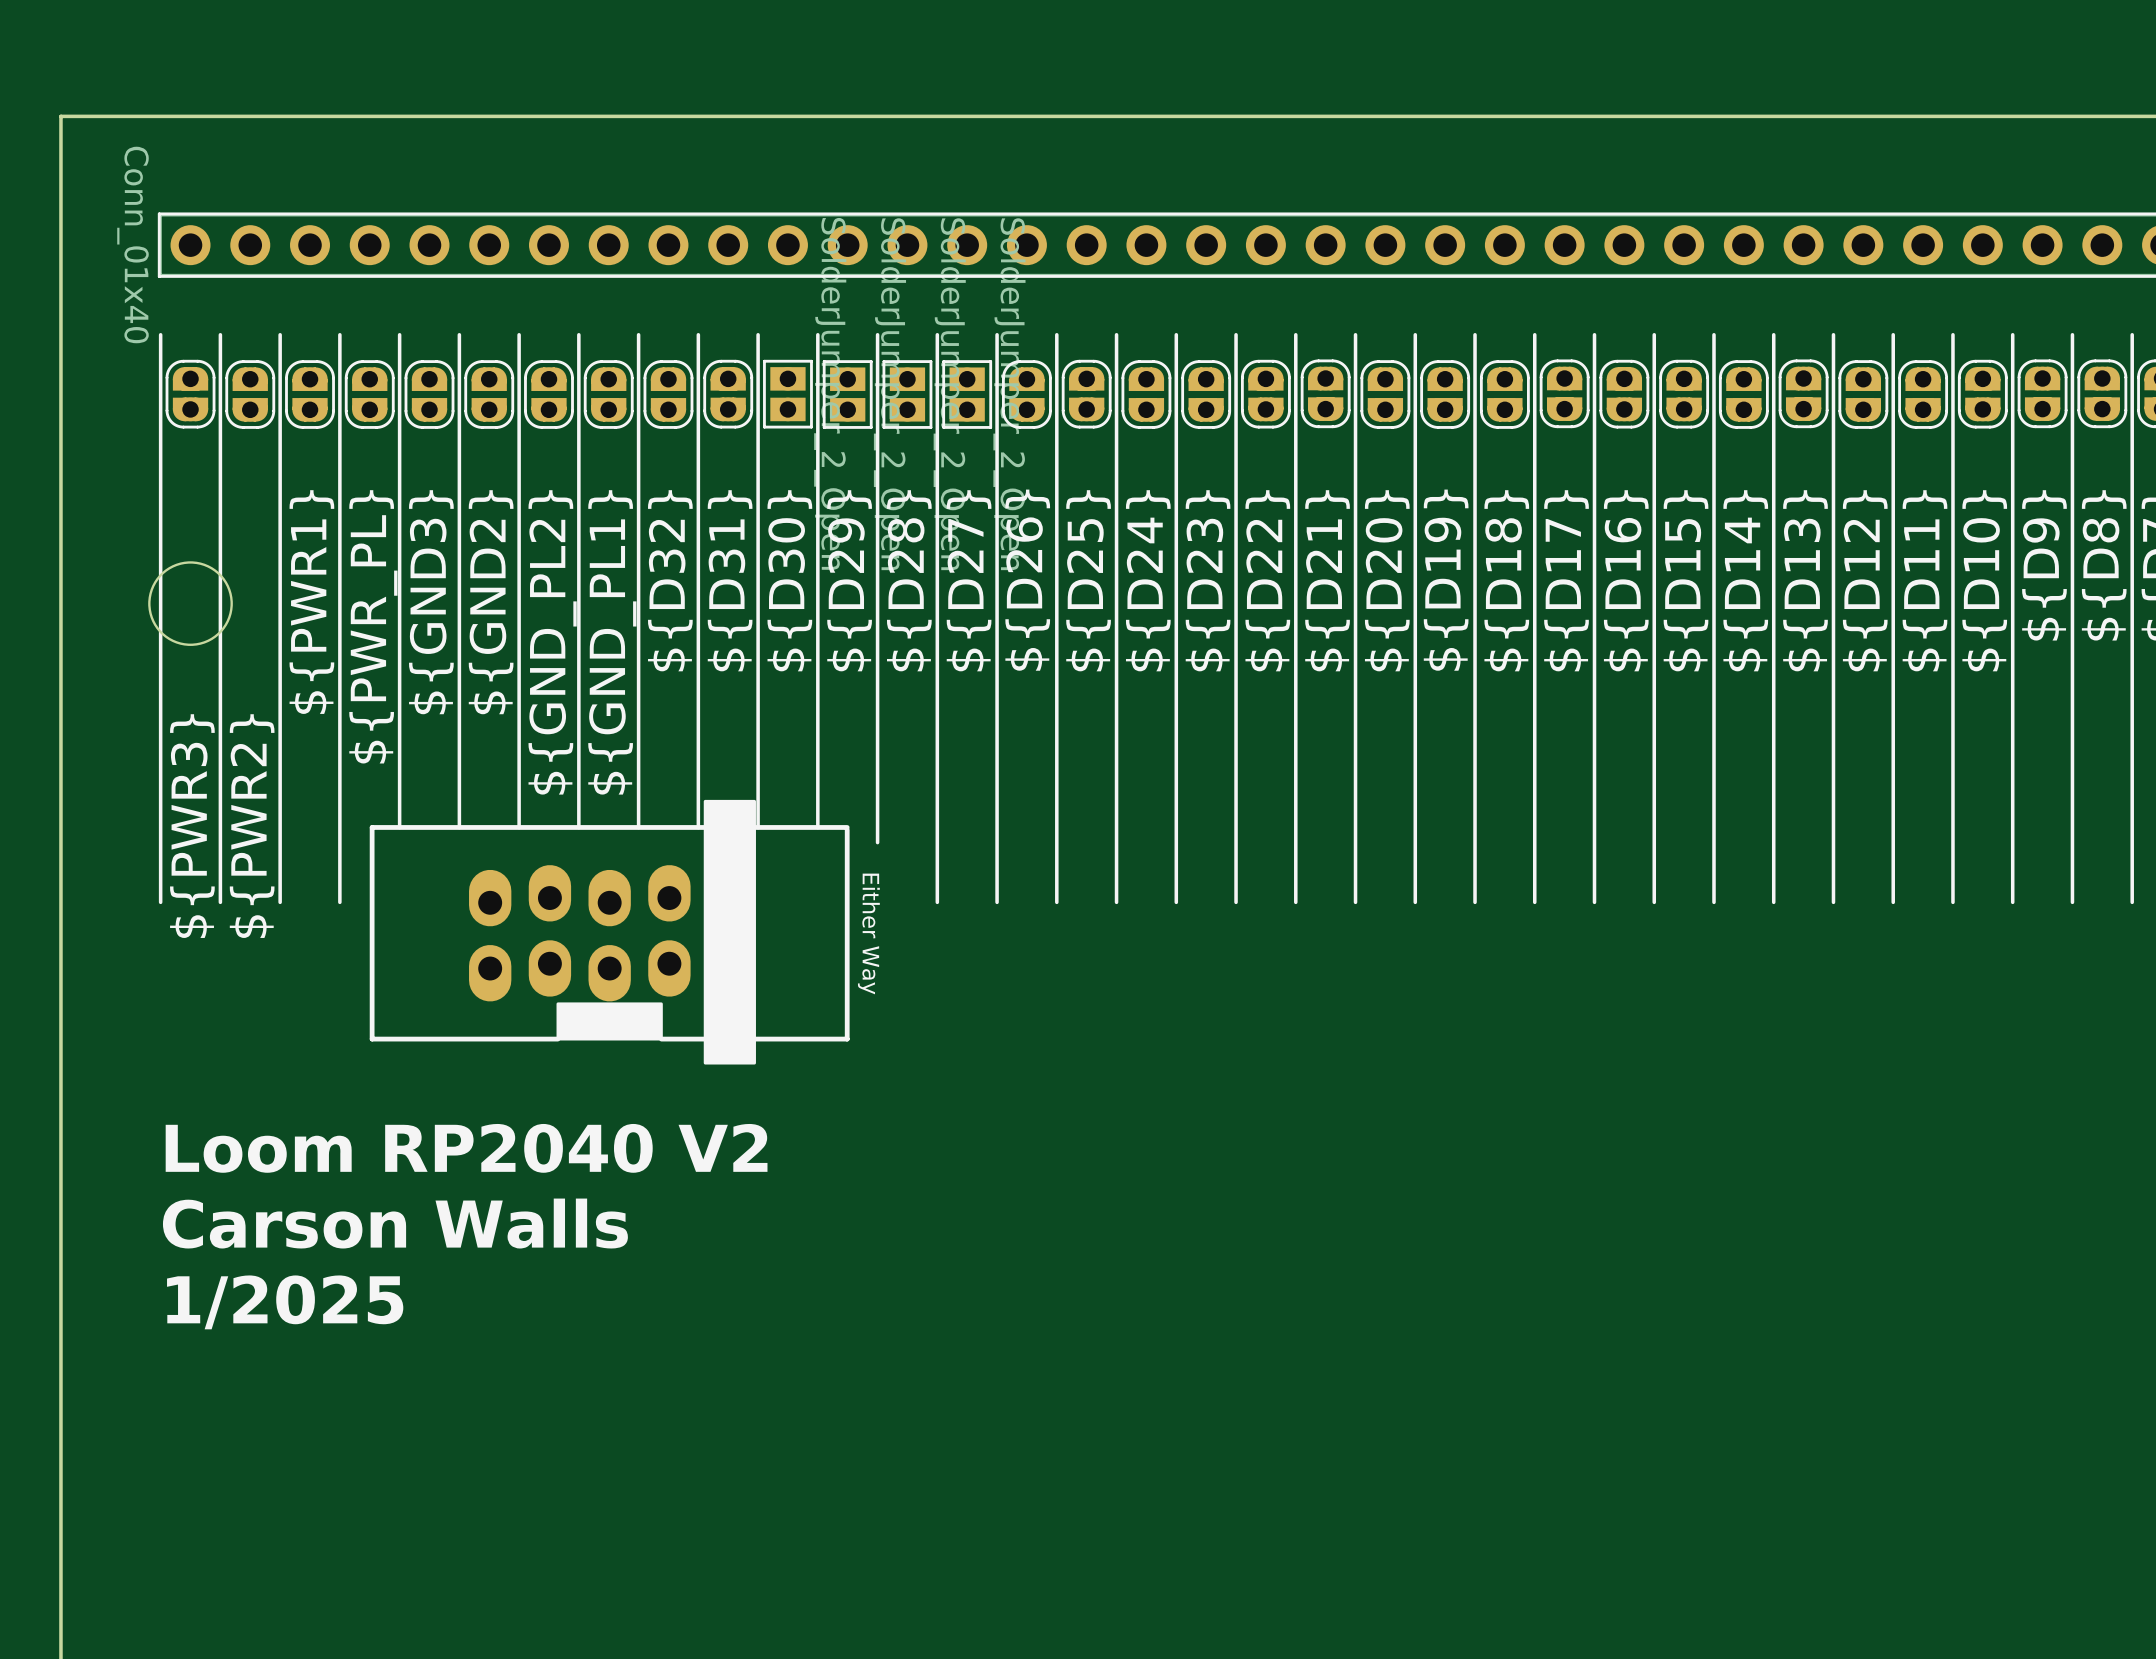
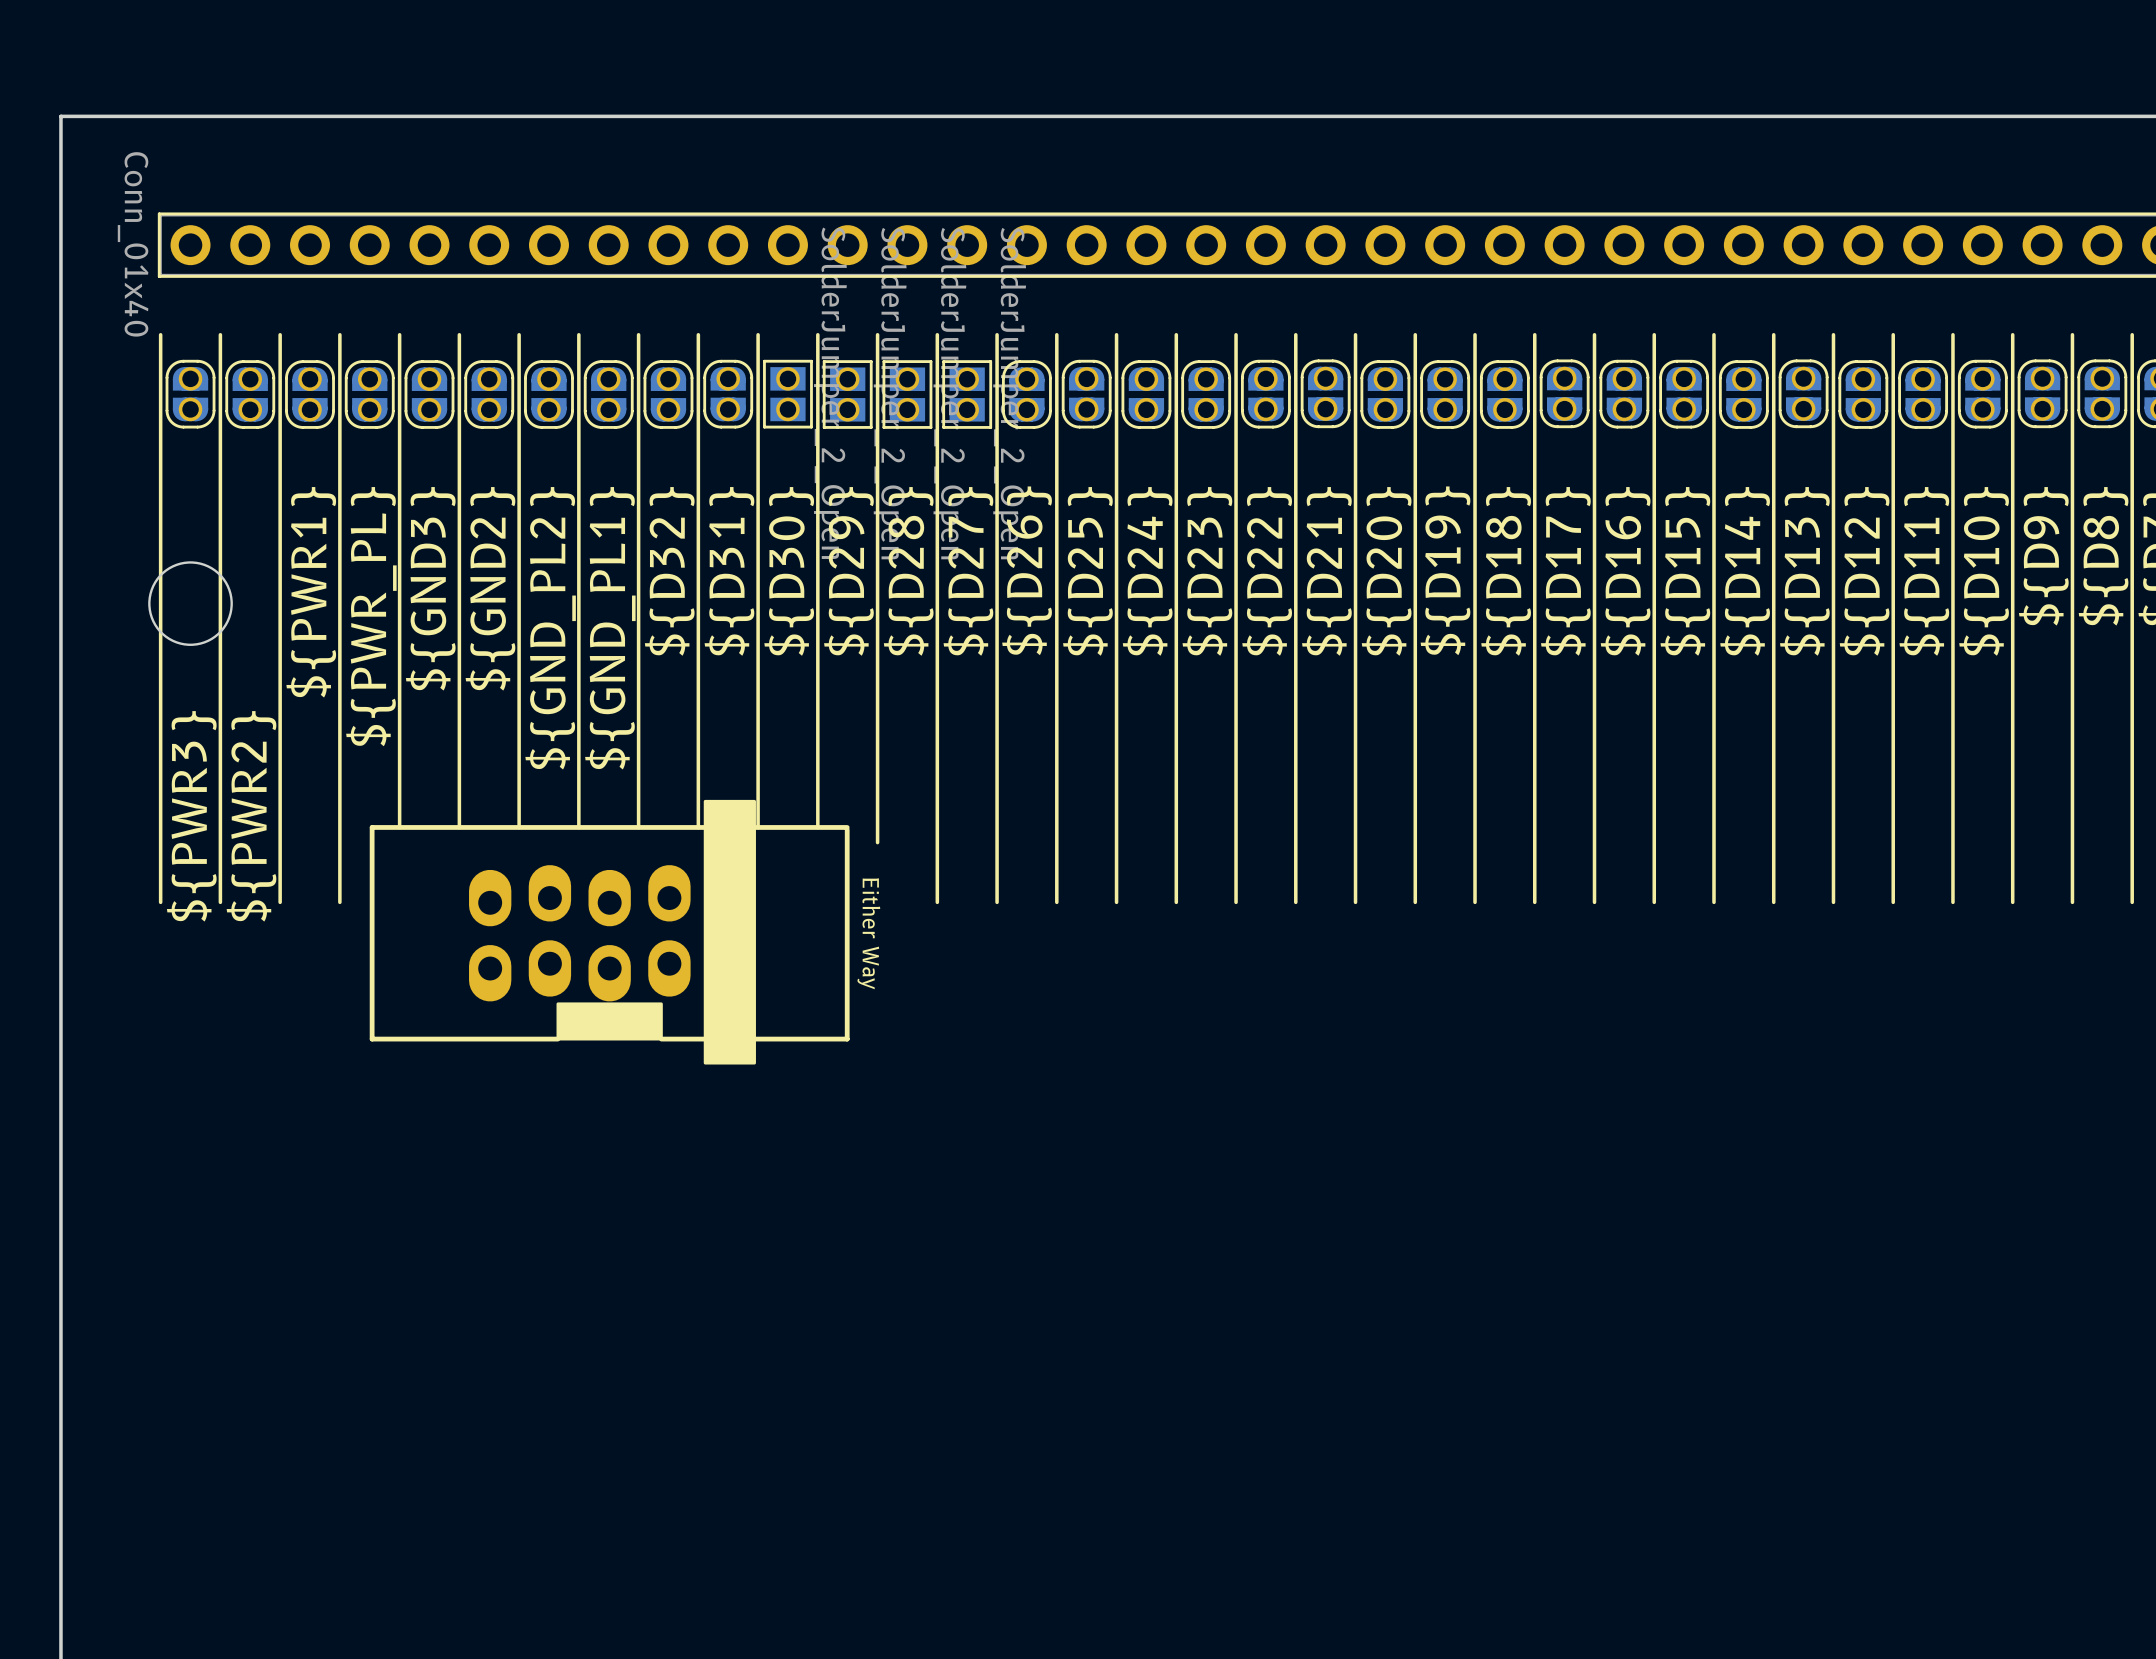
text: Loom RP2040 V2 (466, 1148) -> none
text: Carson Walls (395, 1223) -> none
text: 1/2025 (285, 1302) -> none

